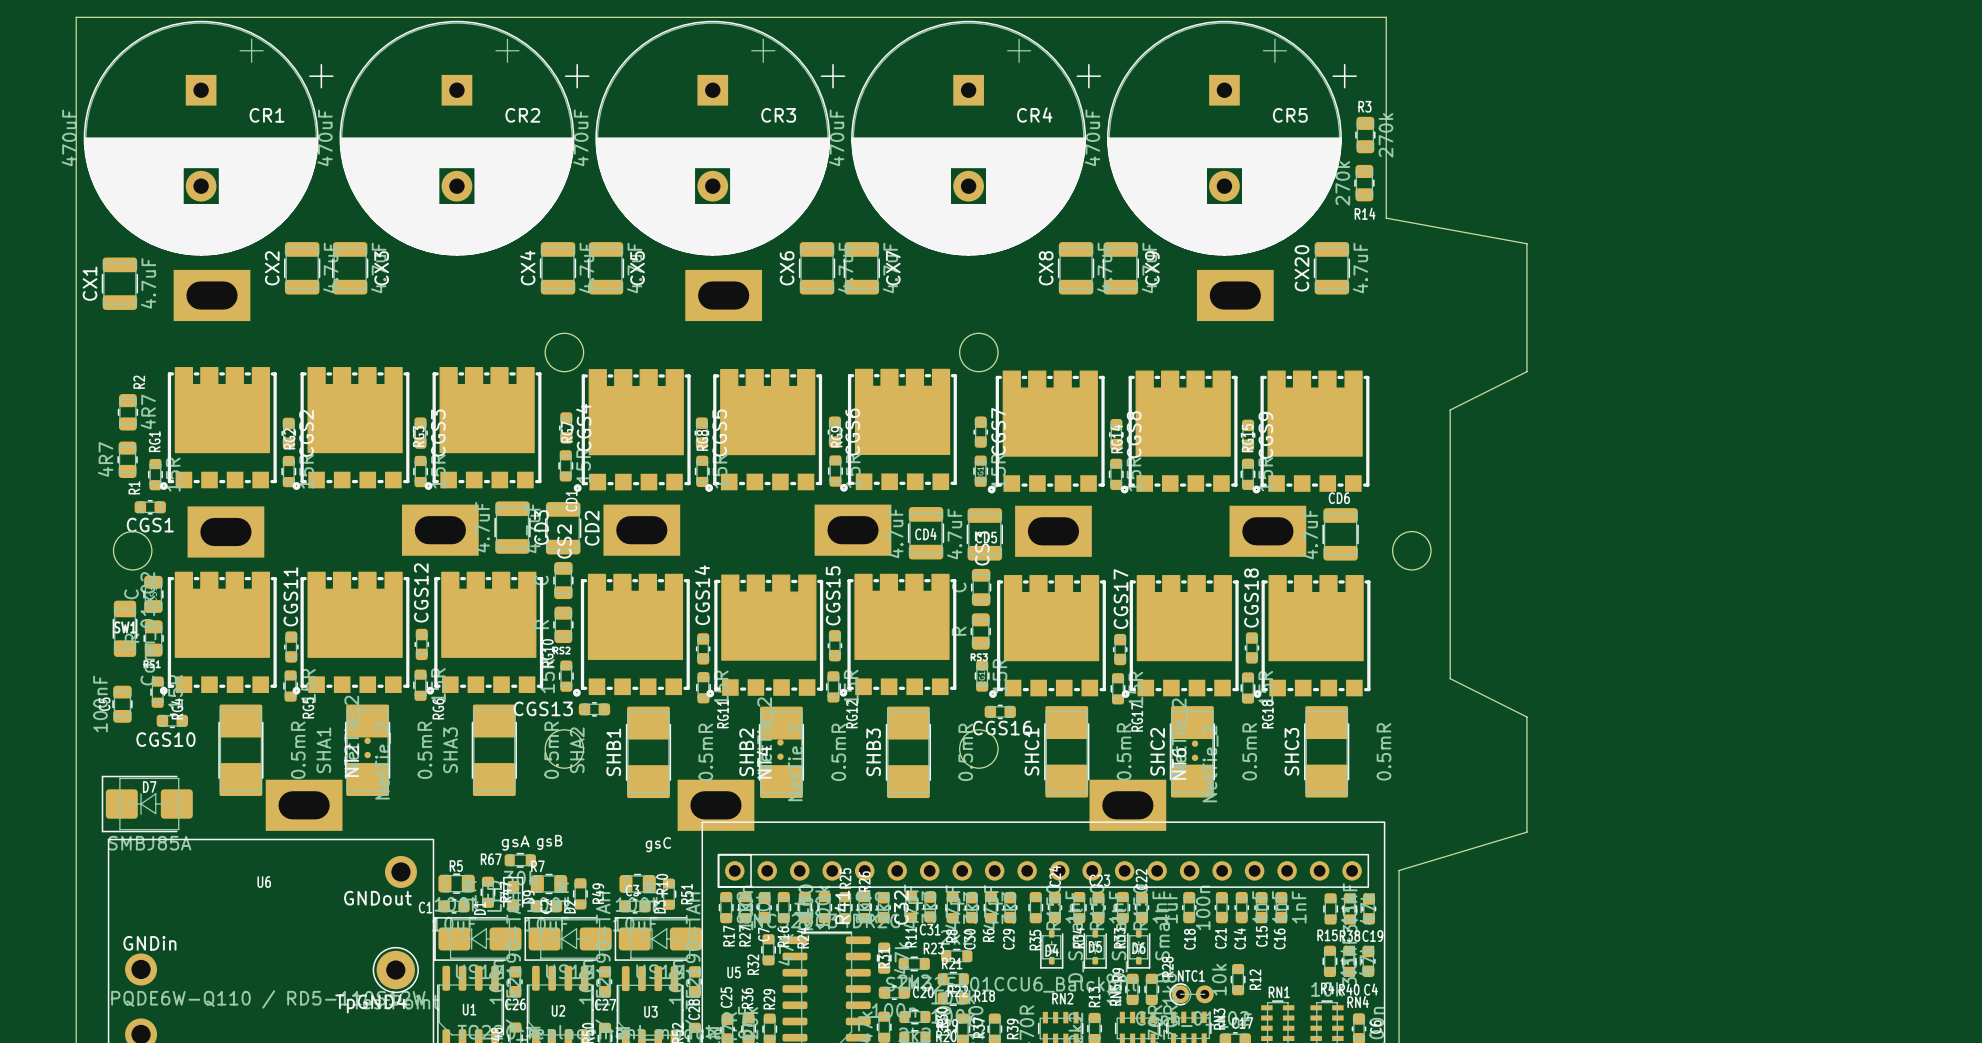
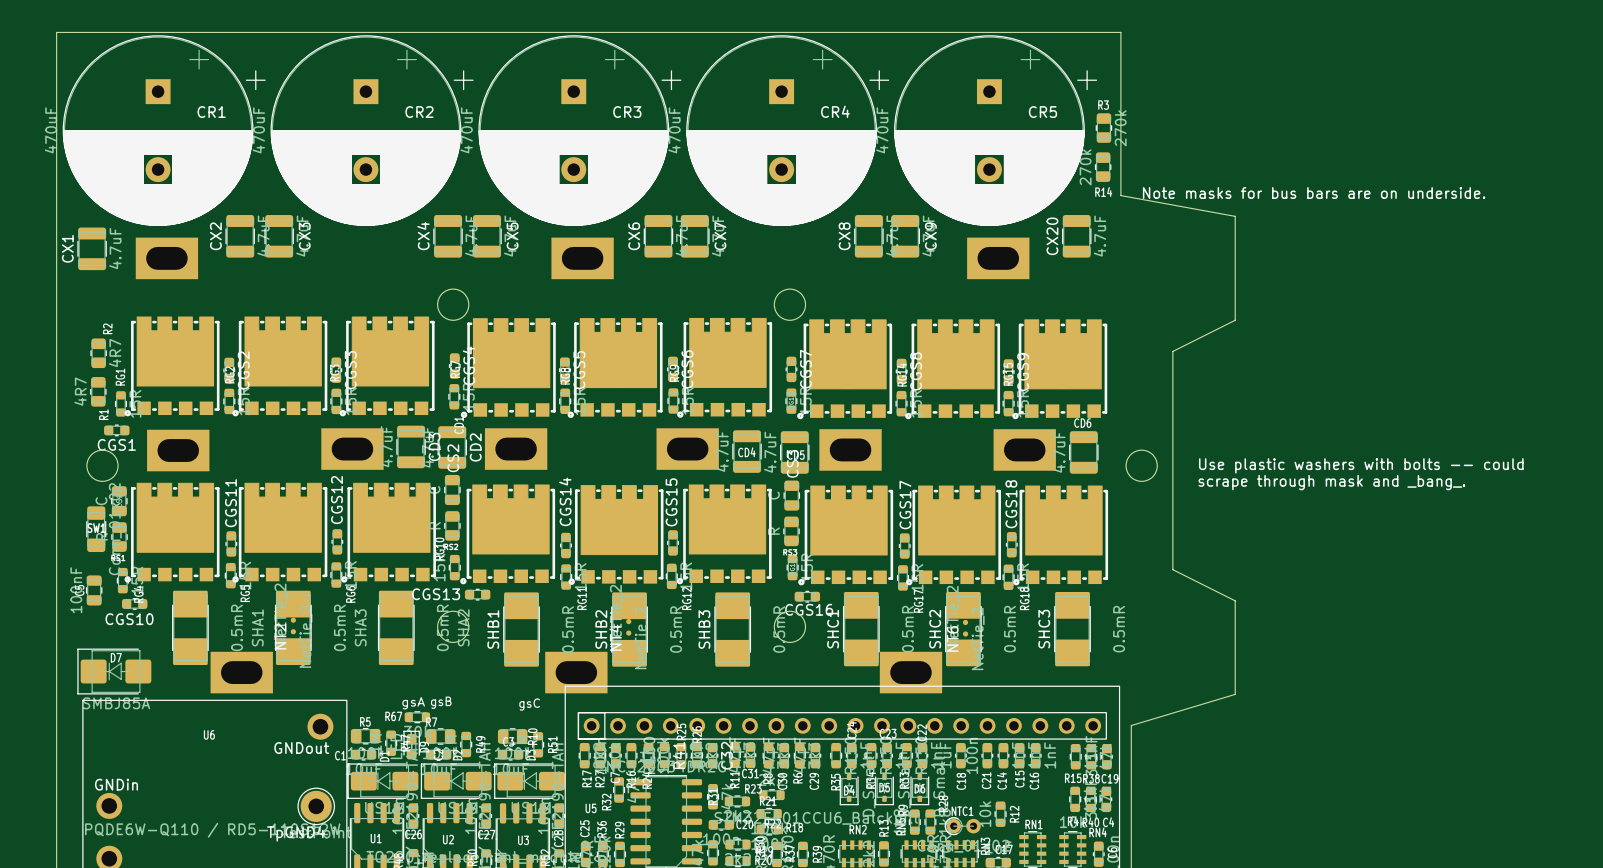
text: none -> Note masks for bus bars are on underside. (1314, 193)
text: none -> Use plastic washers with bolts -- could (1361, 465)
text: none -> scrape through mask and _bang_. (1331, 482)

